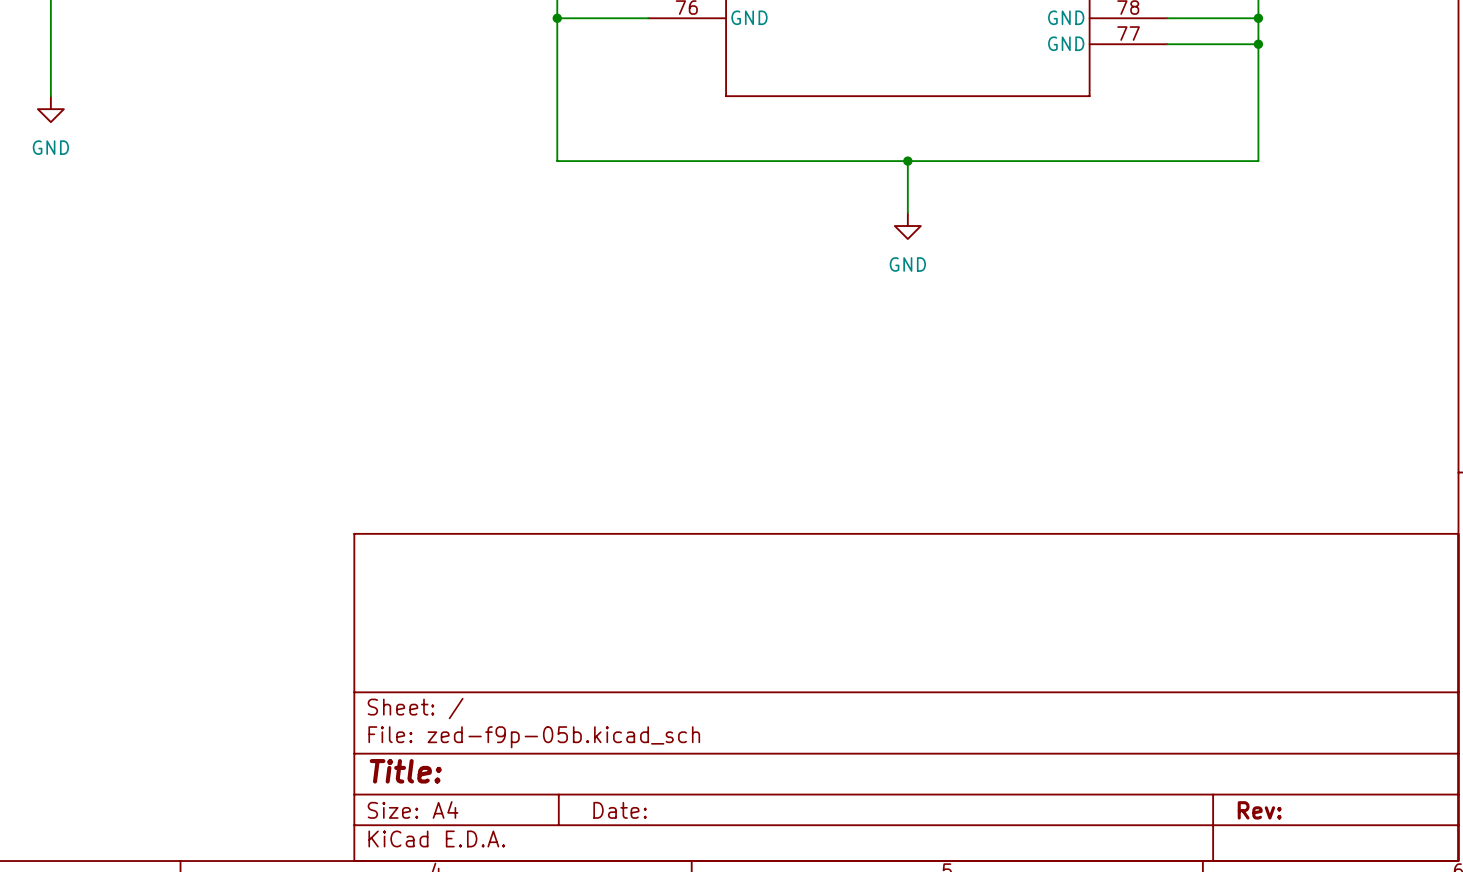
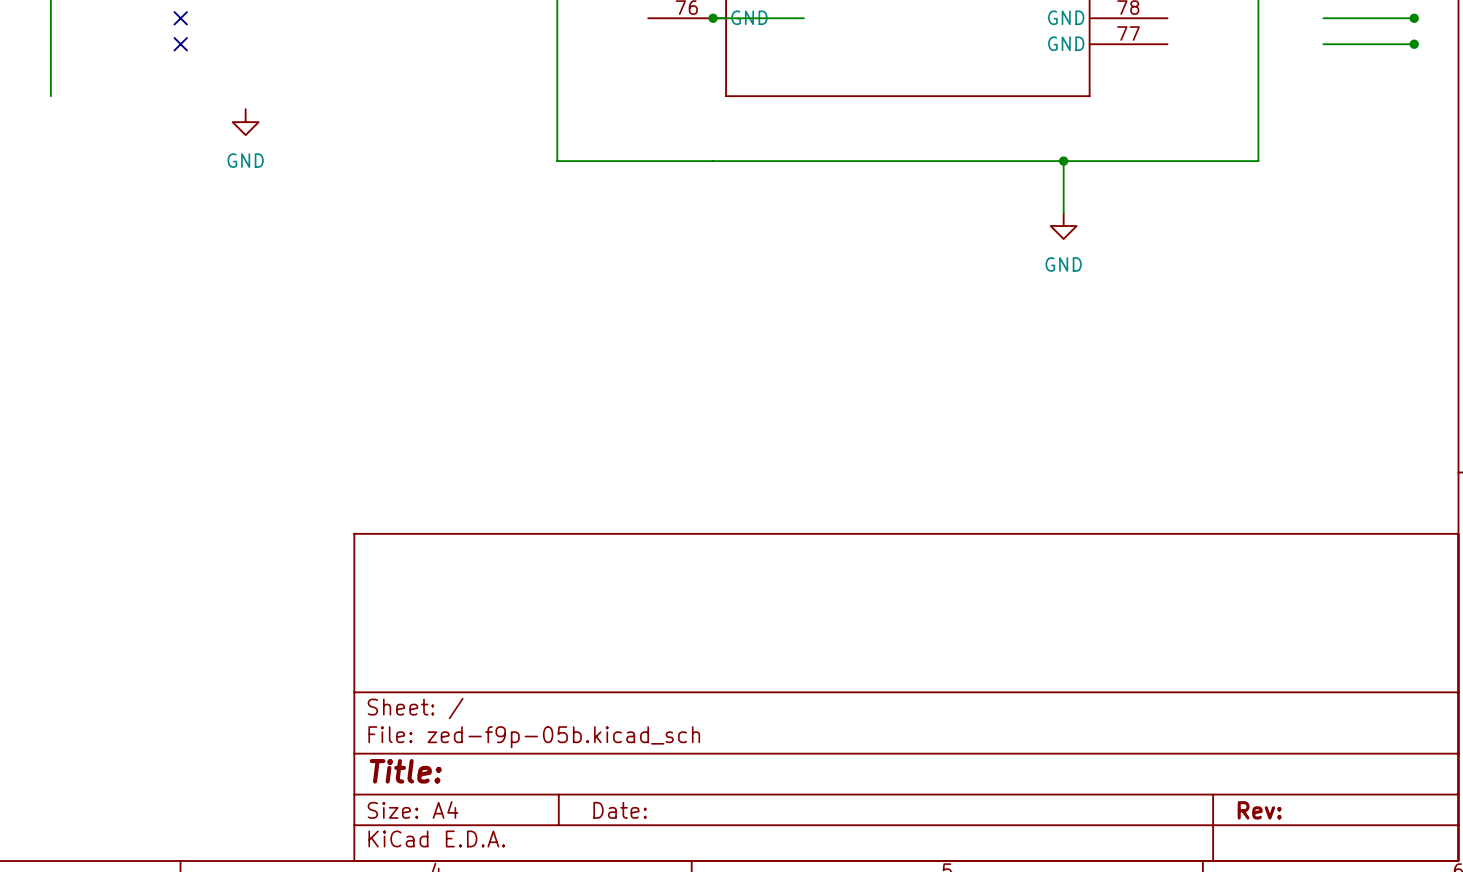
no-connect mark: none -> (180, 18)
wire: (557, 18) (648, 18) -> (713, 18) (803, 18)
junction: (557, 18) -> none
junction: none -> (713, 18)
wire: (1167, 18) (1258, 18) -> (1323, 18) (1414, 18)
junction: (1258, 18) -> none
junction: none -> (1414, 18)
no-connect mark: none -> (180, 44)
wire: (1167, 44) (1258, 44) -> (1323, 44) (1414, 44)
junction: (1258, 44) -> none
junction: none -> (1414, 44)
power symbol position: GND (50, 109) -> GND (245, 122)
wire: (907, 161) (907, 213) -> (1063, 161) (1063, 213)
junction: (907, 161) -> none
junction: none -> (1063, 161)
power symbol position: GND (907, 226) -> GND (1063, 226)

